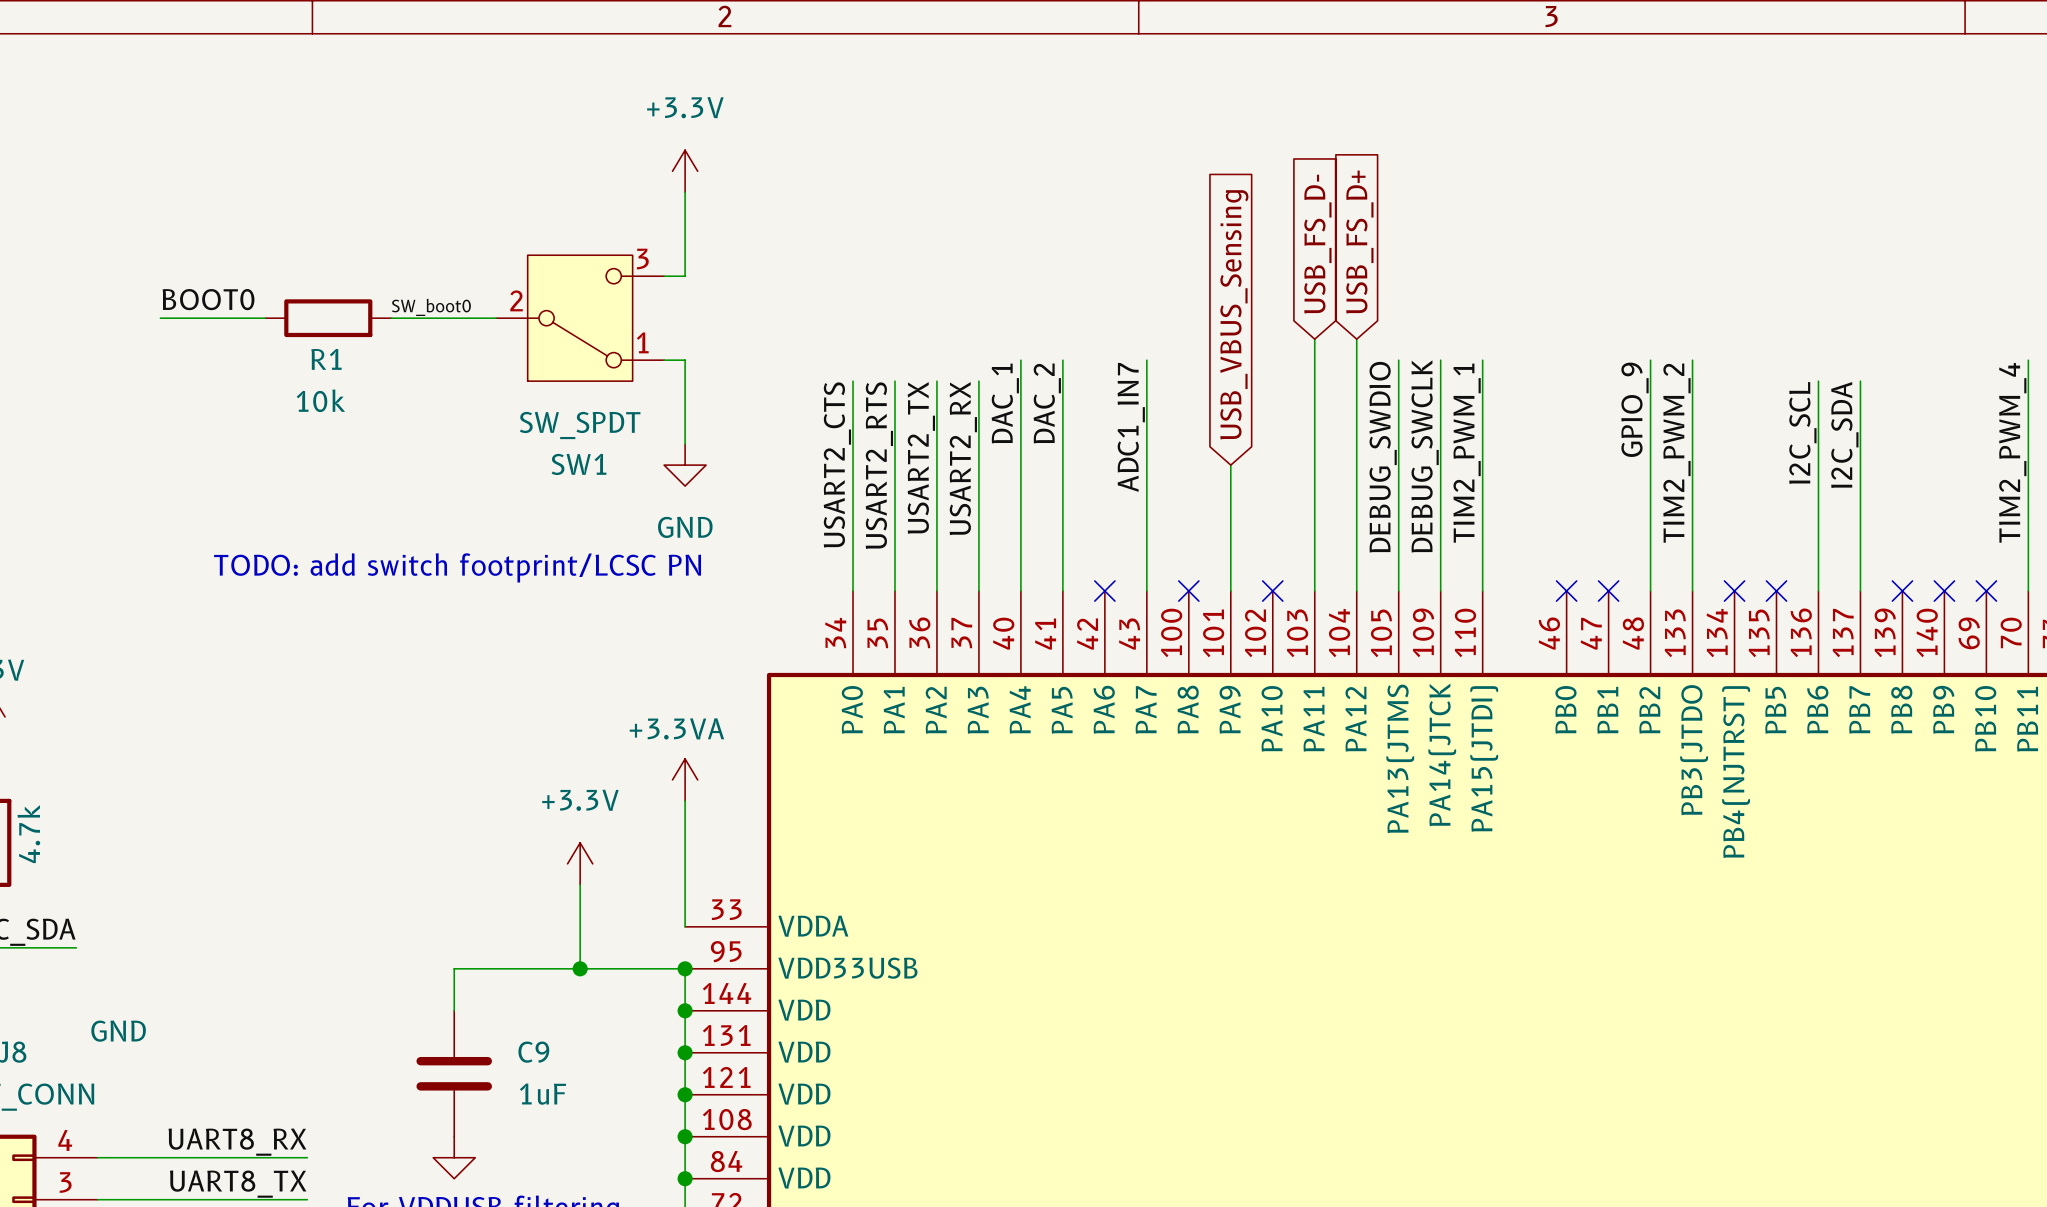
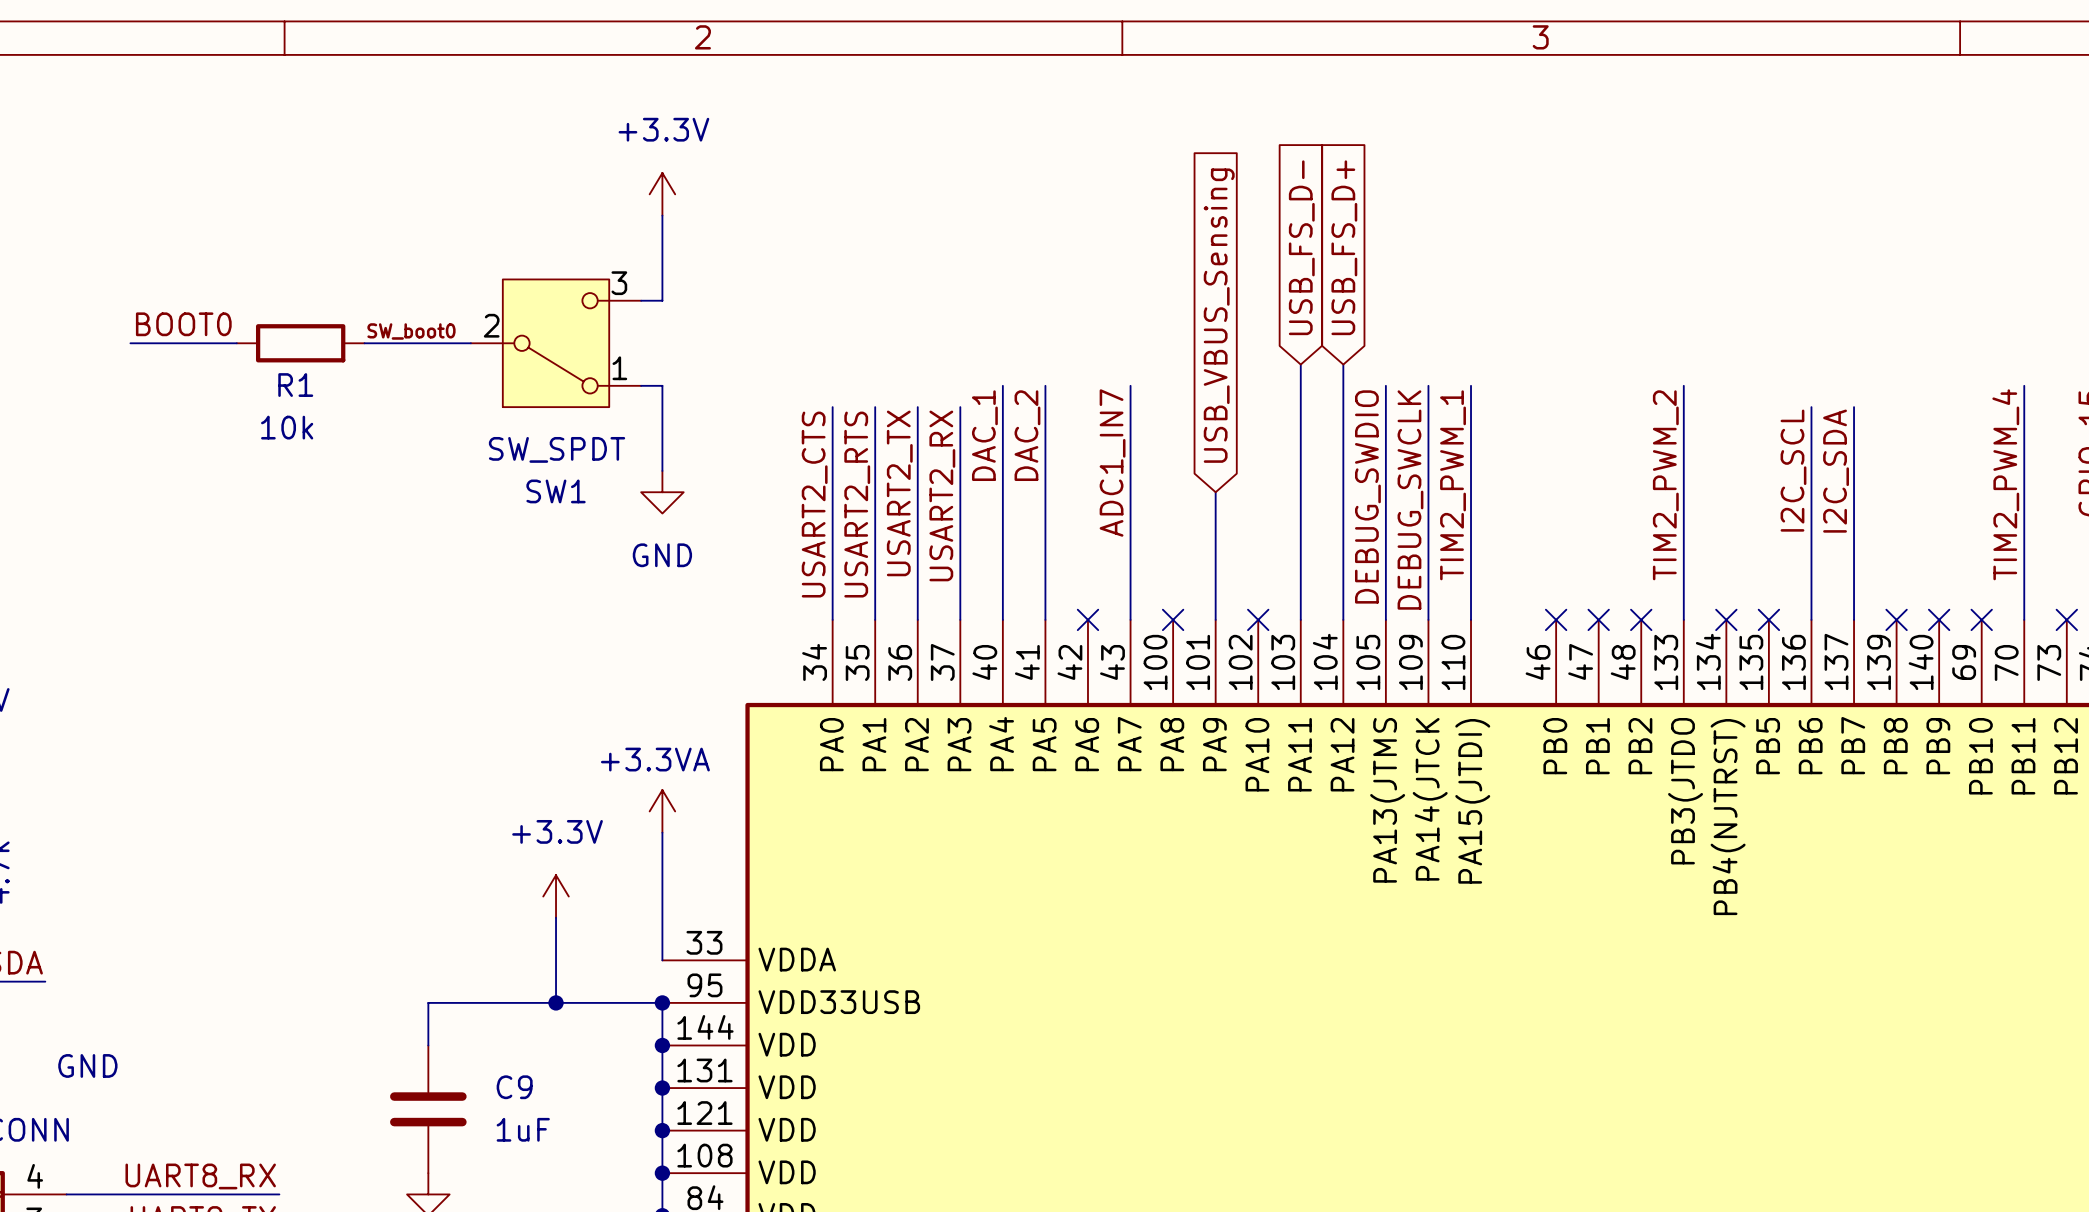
wire: (1650, 360) (1650, 591) -> none
label: GPIO_9 (1634, 409) -> none
text: TODO: add switch footprint/LCSC PN (457, 567) -> none
no-connect mark: none -> (1641, 619)

